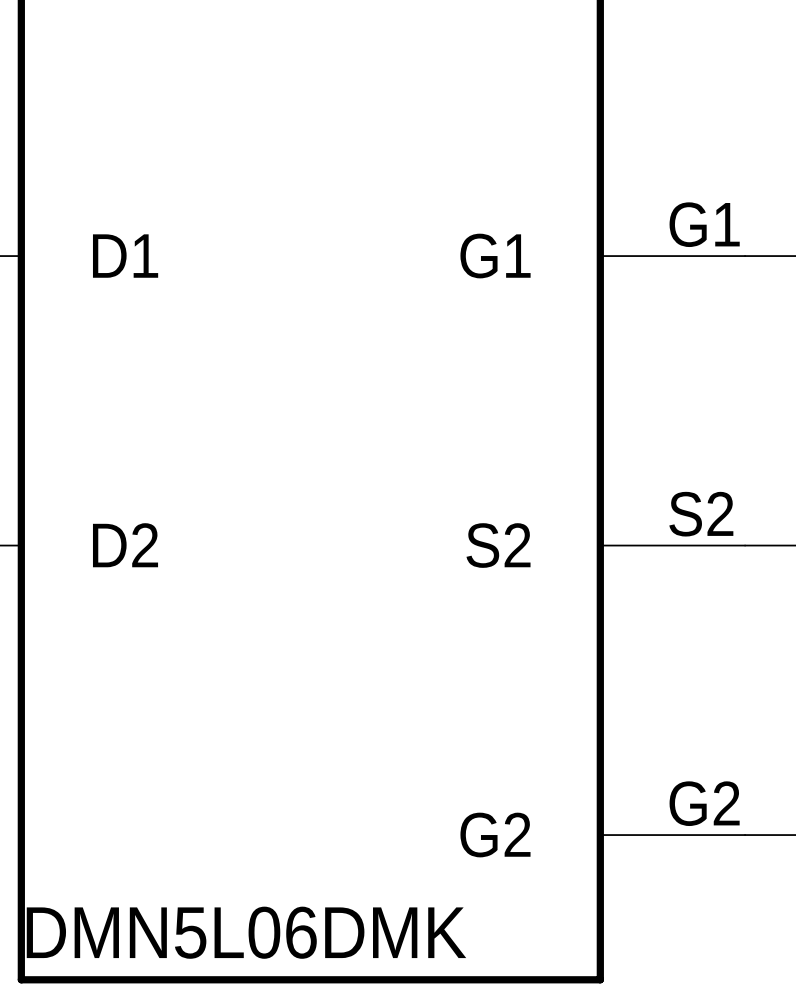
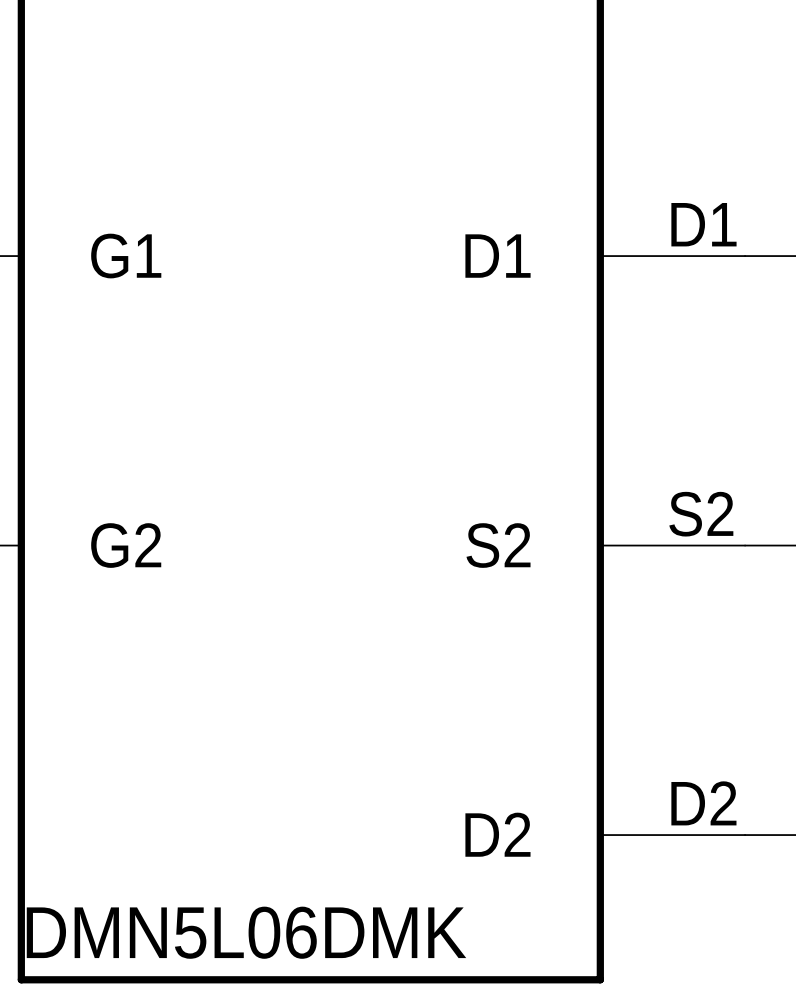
part pin number: G1 (704, 224) -> D1 (703, 224)
part pin name: D1 (125, 256) -> G1 (126, 256)
part pin name: G1 (495, 256) -> D1 (498, 256)
part pin name: D2 (125, 545) -> G2 (126, 545)
part pin number: G2 (704, 803) -> D2 (703, 803)
part pin name: G2 (495, 835) -> D2 (497, 834)

